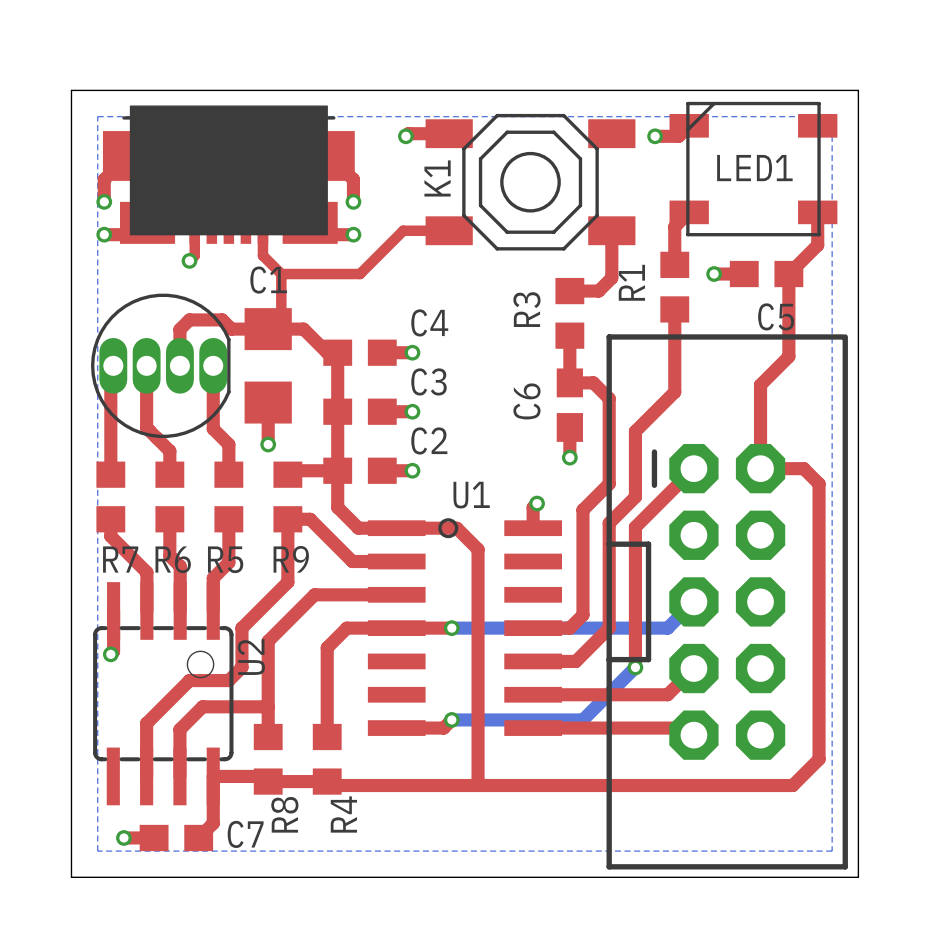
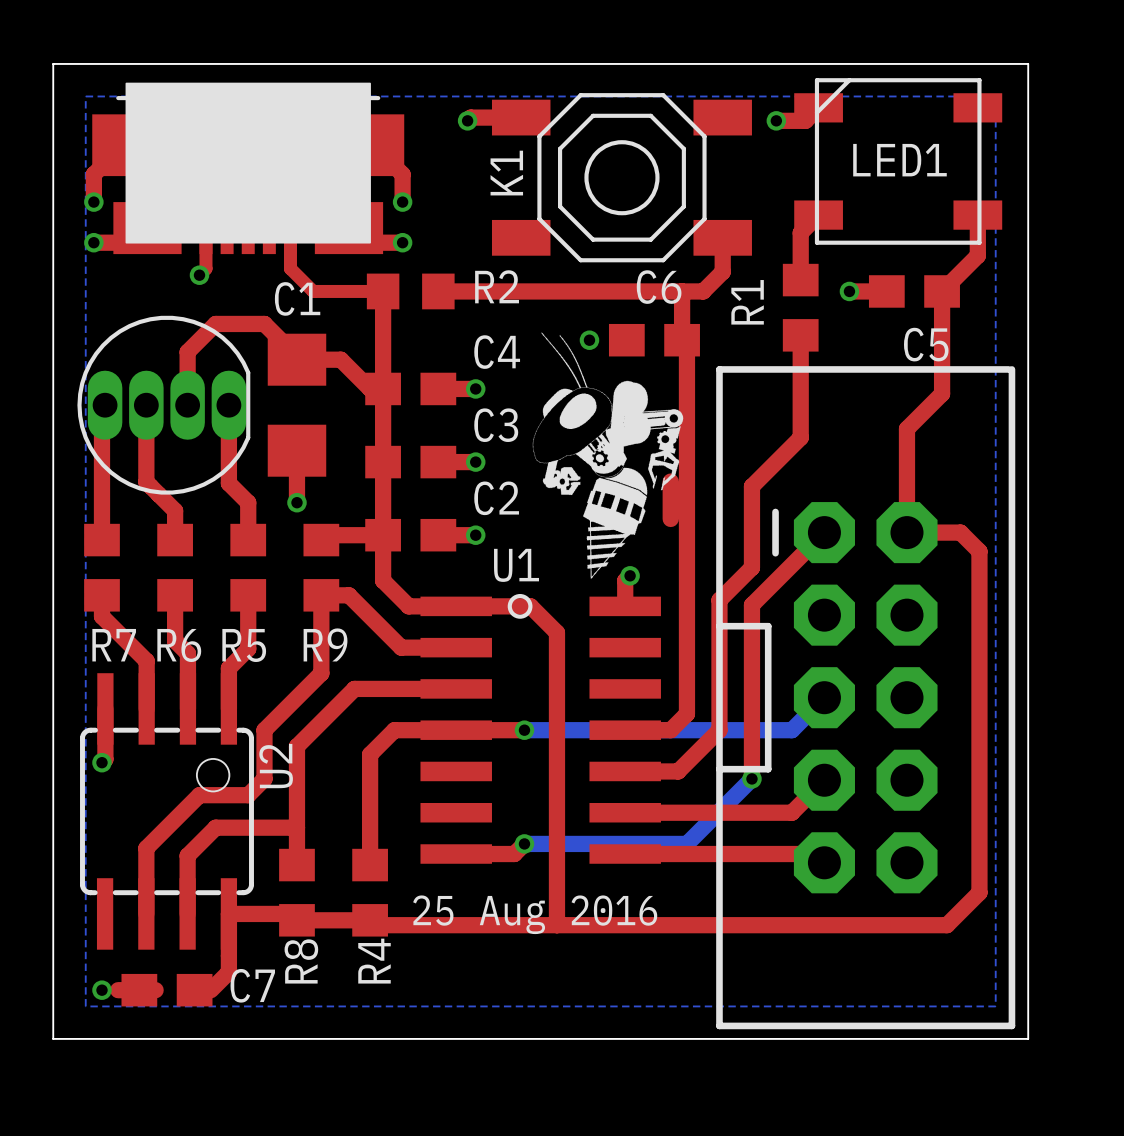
top track: (449, 230) (403, 230) (360, 274) (337, 274) -> (383, 388) (383, 291)
top track: (611, 258) (611, 277) (598, 291) (569, 291) -> (722, 271) (703, 291) (438, 291)
top track: (281, 274) (281, 315) (268, 329) (231, 329) (222, 319) (189, 319) (179, 329) -> (296, 356) (264, 323) (215, 323) (187, 352) (187, 360)
R2: none -> (410, 291)
drawing: none -> [532, 332, 684, 579]
via: none -> (589, 340)
R3: (569, 313) -> none
top track: (569, 335) (569, 382) (593, 382) (609, 398) (609, 483) (582, 510) -> (682, 291) (682, 340) (686, 345) (686, 583)
C6 rotation: 0° (569, 405) -> 90° clockwise (654, 340)
C6 position: (569, 405) -> (654, 340)
via: (569, 457) -> none
U1 name position: U1 (471, 495) -> U1 (516, 565)
text: none -> 25 Aug 2016 (535, 914)
R8 name position: R8 (284, 814) -> R8 (301, 961)
R4 name position: R4 (343, 814) -> R4 (374, 961)
via position: (123, 837) -> (101, 990)
C7 position: (176, 837) -> (166, 990)

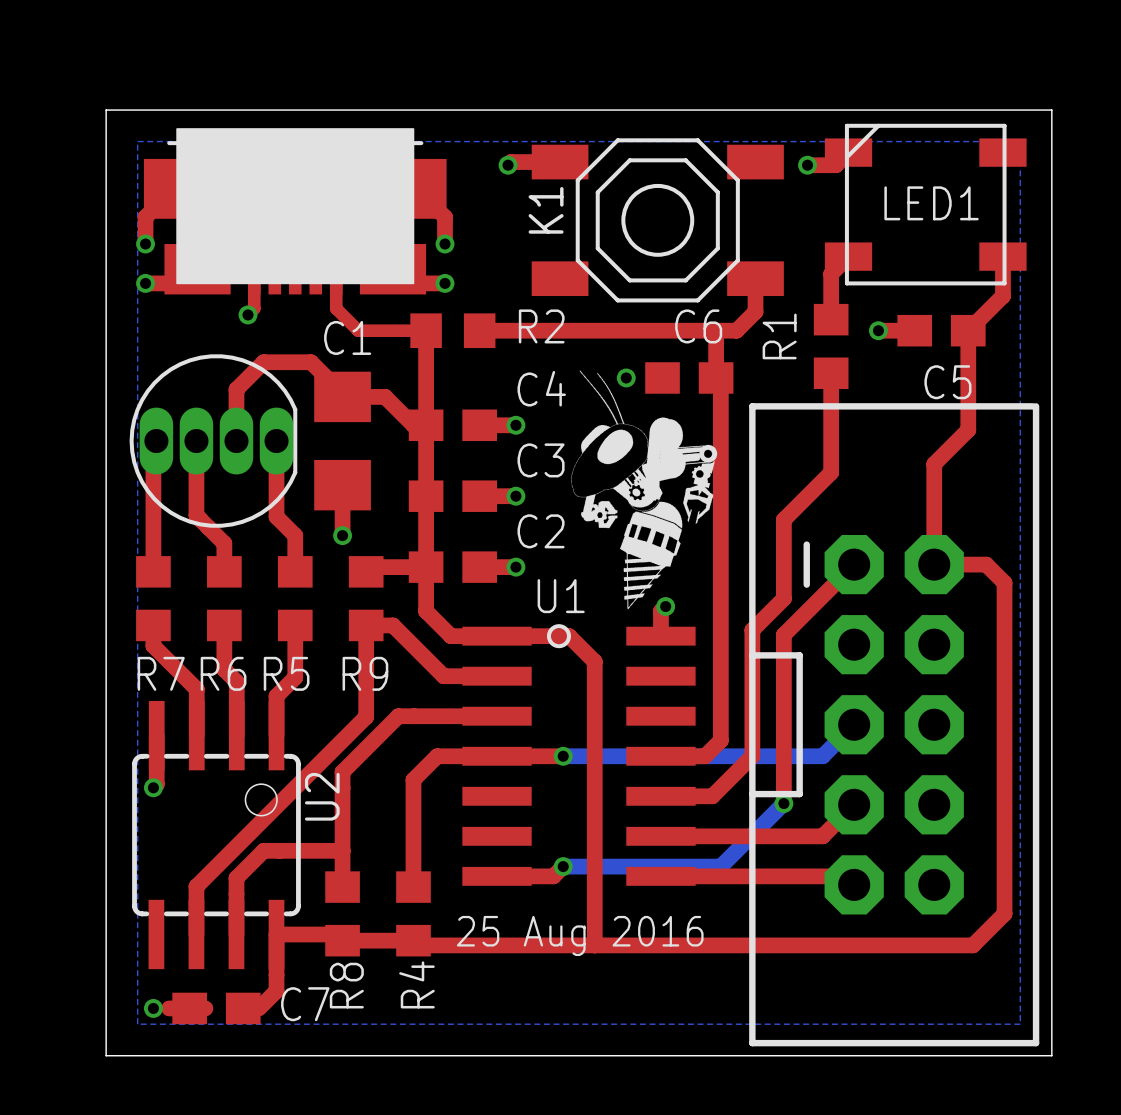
top track: (670, 481) (670, 518) -> none
top track: (321, 673) (264, 730) (264, 778) (248, 795) (199, 795) (146, 848) (146, 864) -> (366, 701) (366, 716) (196, 886)

